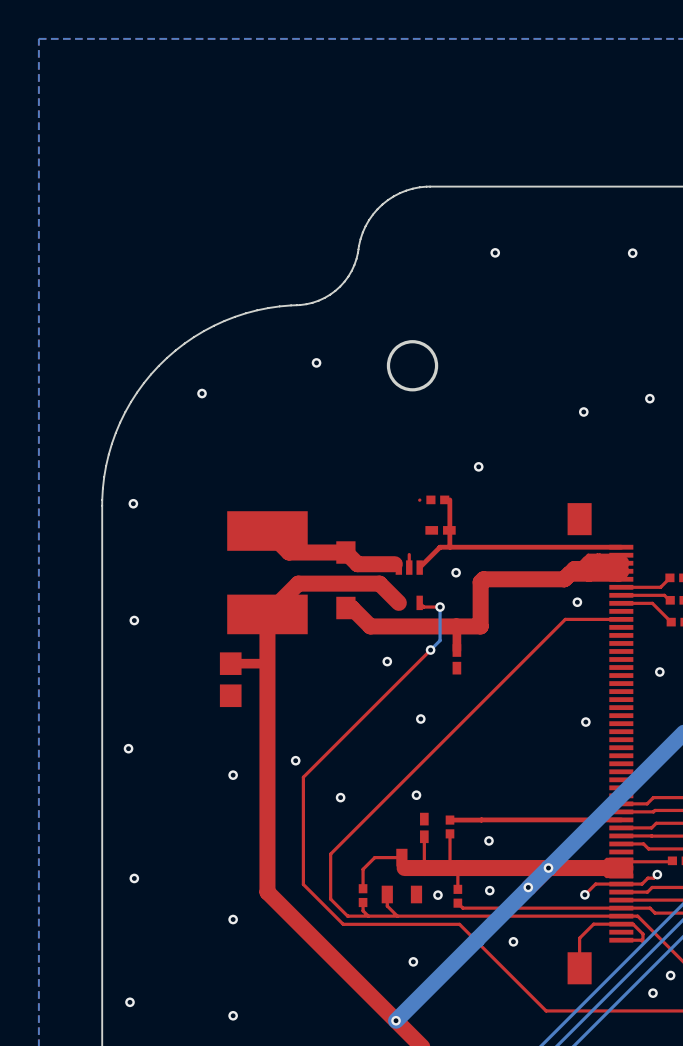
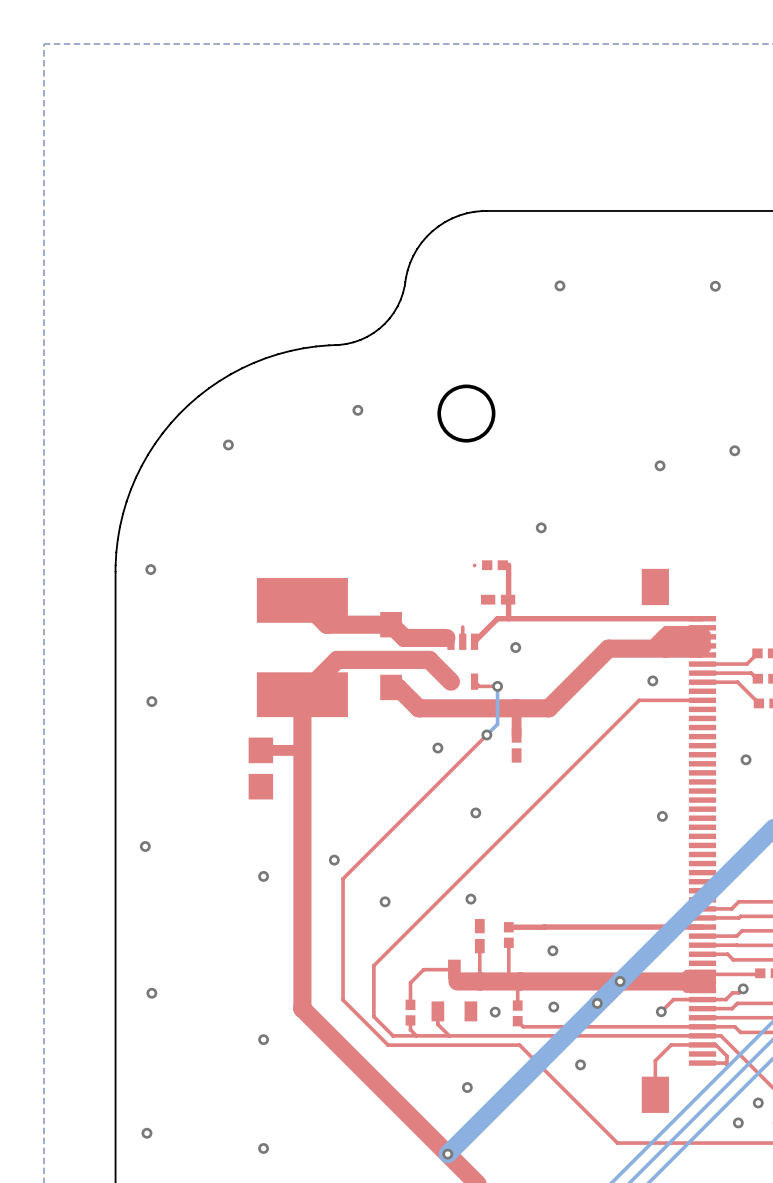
top track: (583, 569) (574, 569) (564, 579) (483, 579) (480, 582) (480, 626) -> (644, 648) (608, 648) (548, 708) (543, 708)

